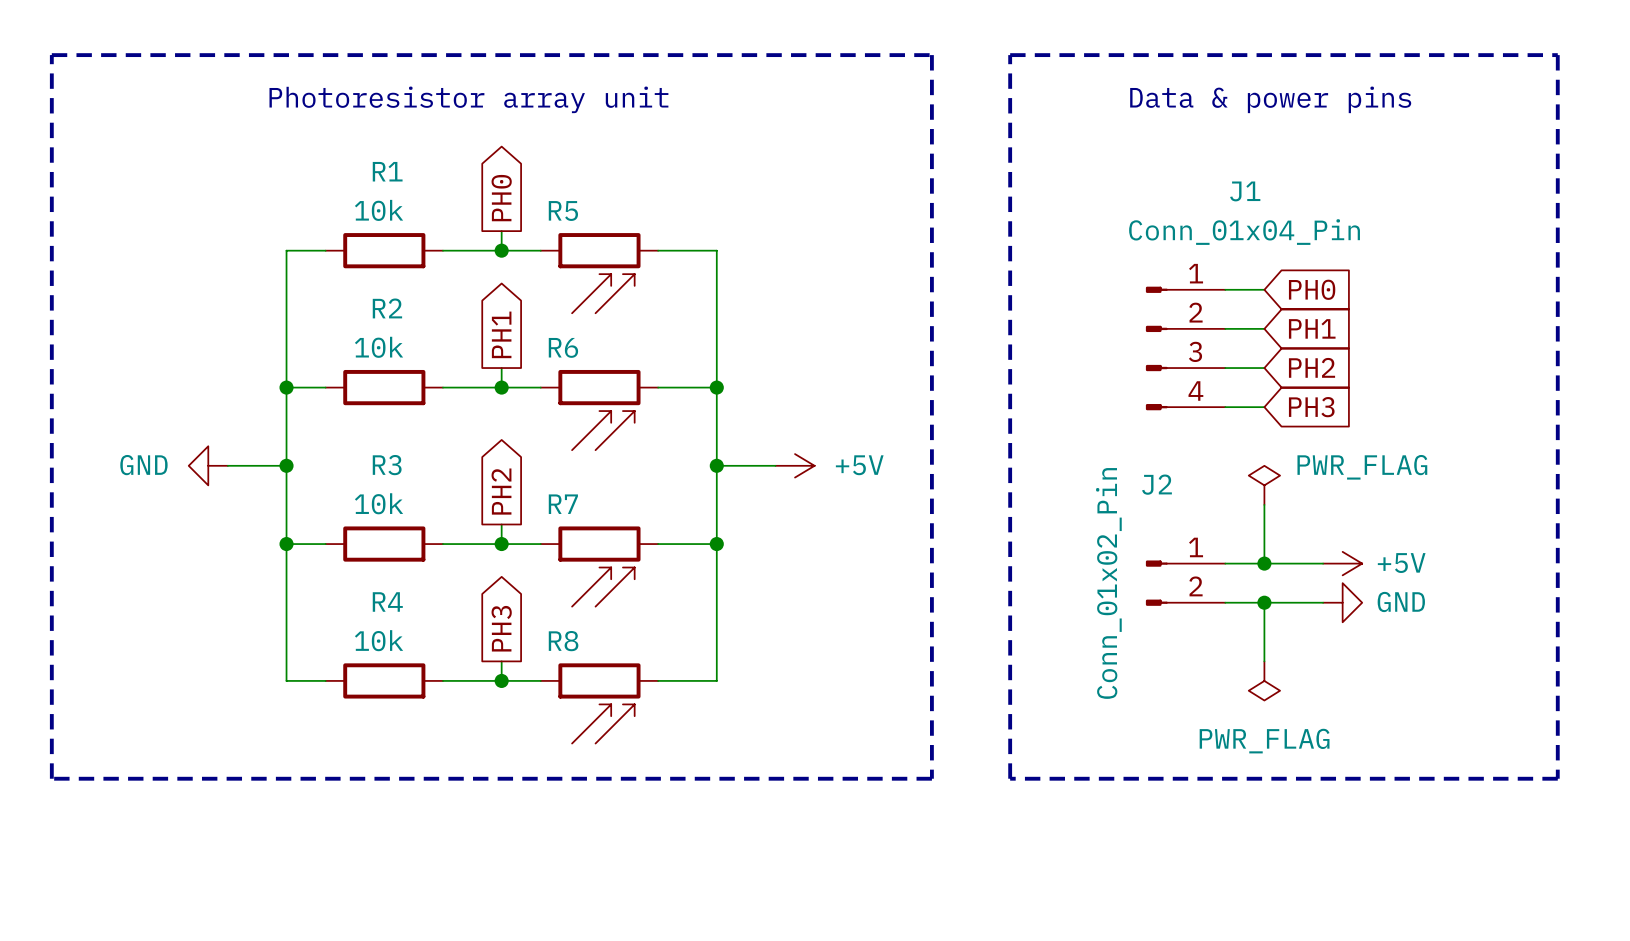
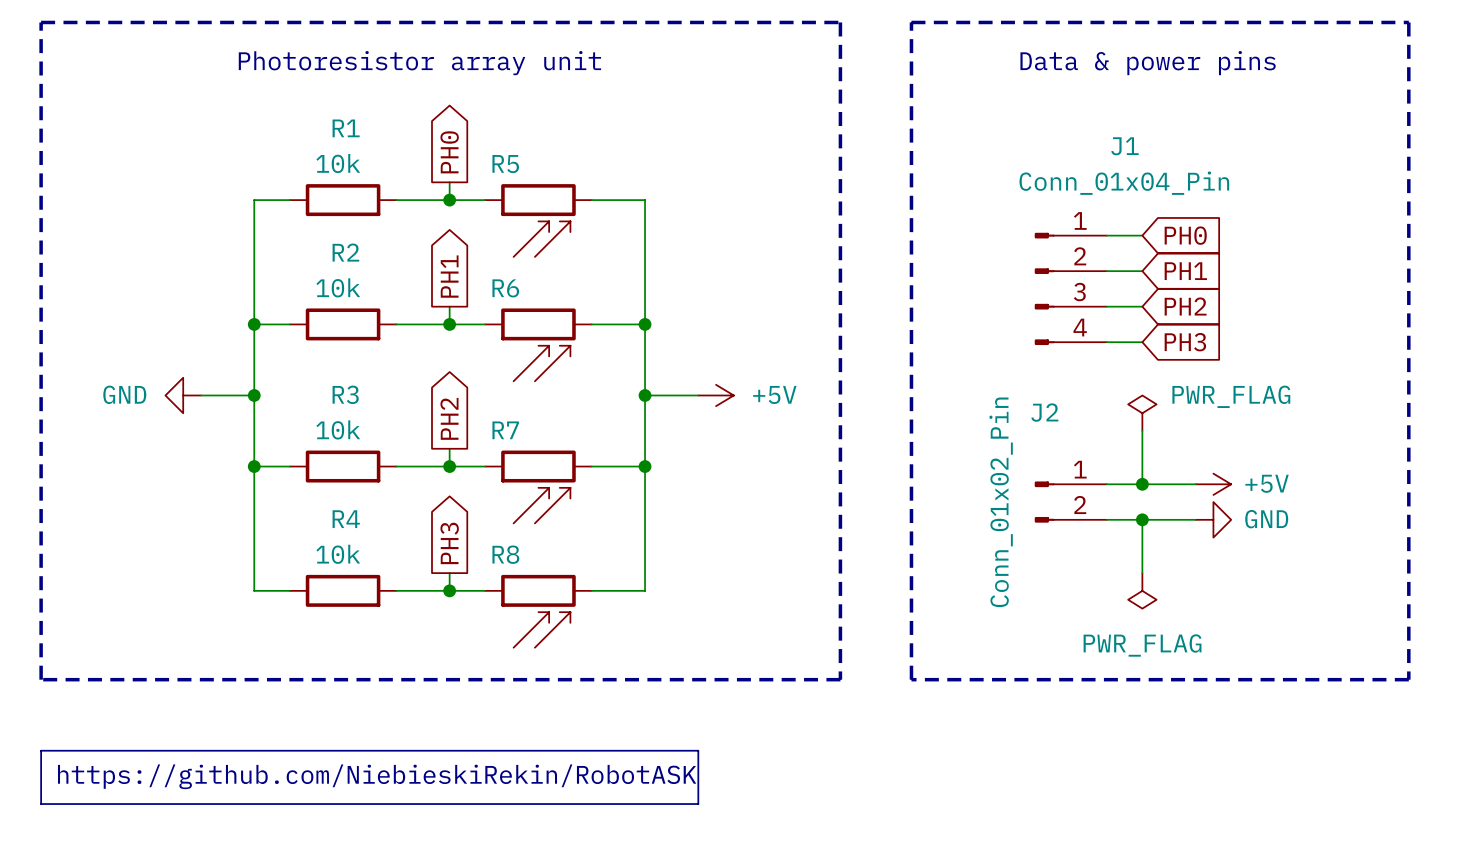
line: none -> (41, 750) (698, 750) (698, 804) (41, 804) (41, 750)
text: none -> https://github.com/NiebieskiRekin/RobotASK (377, 776)

